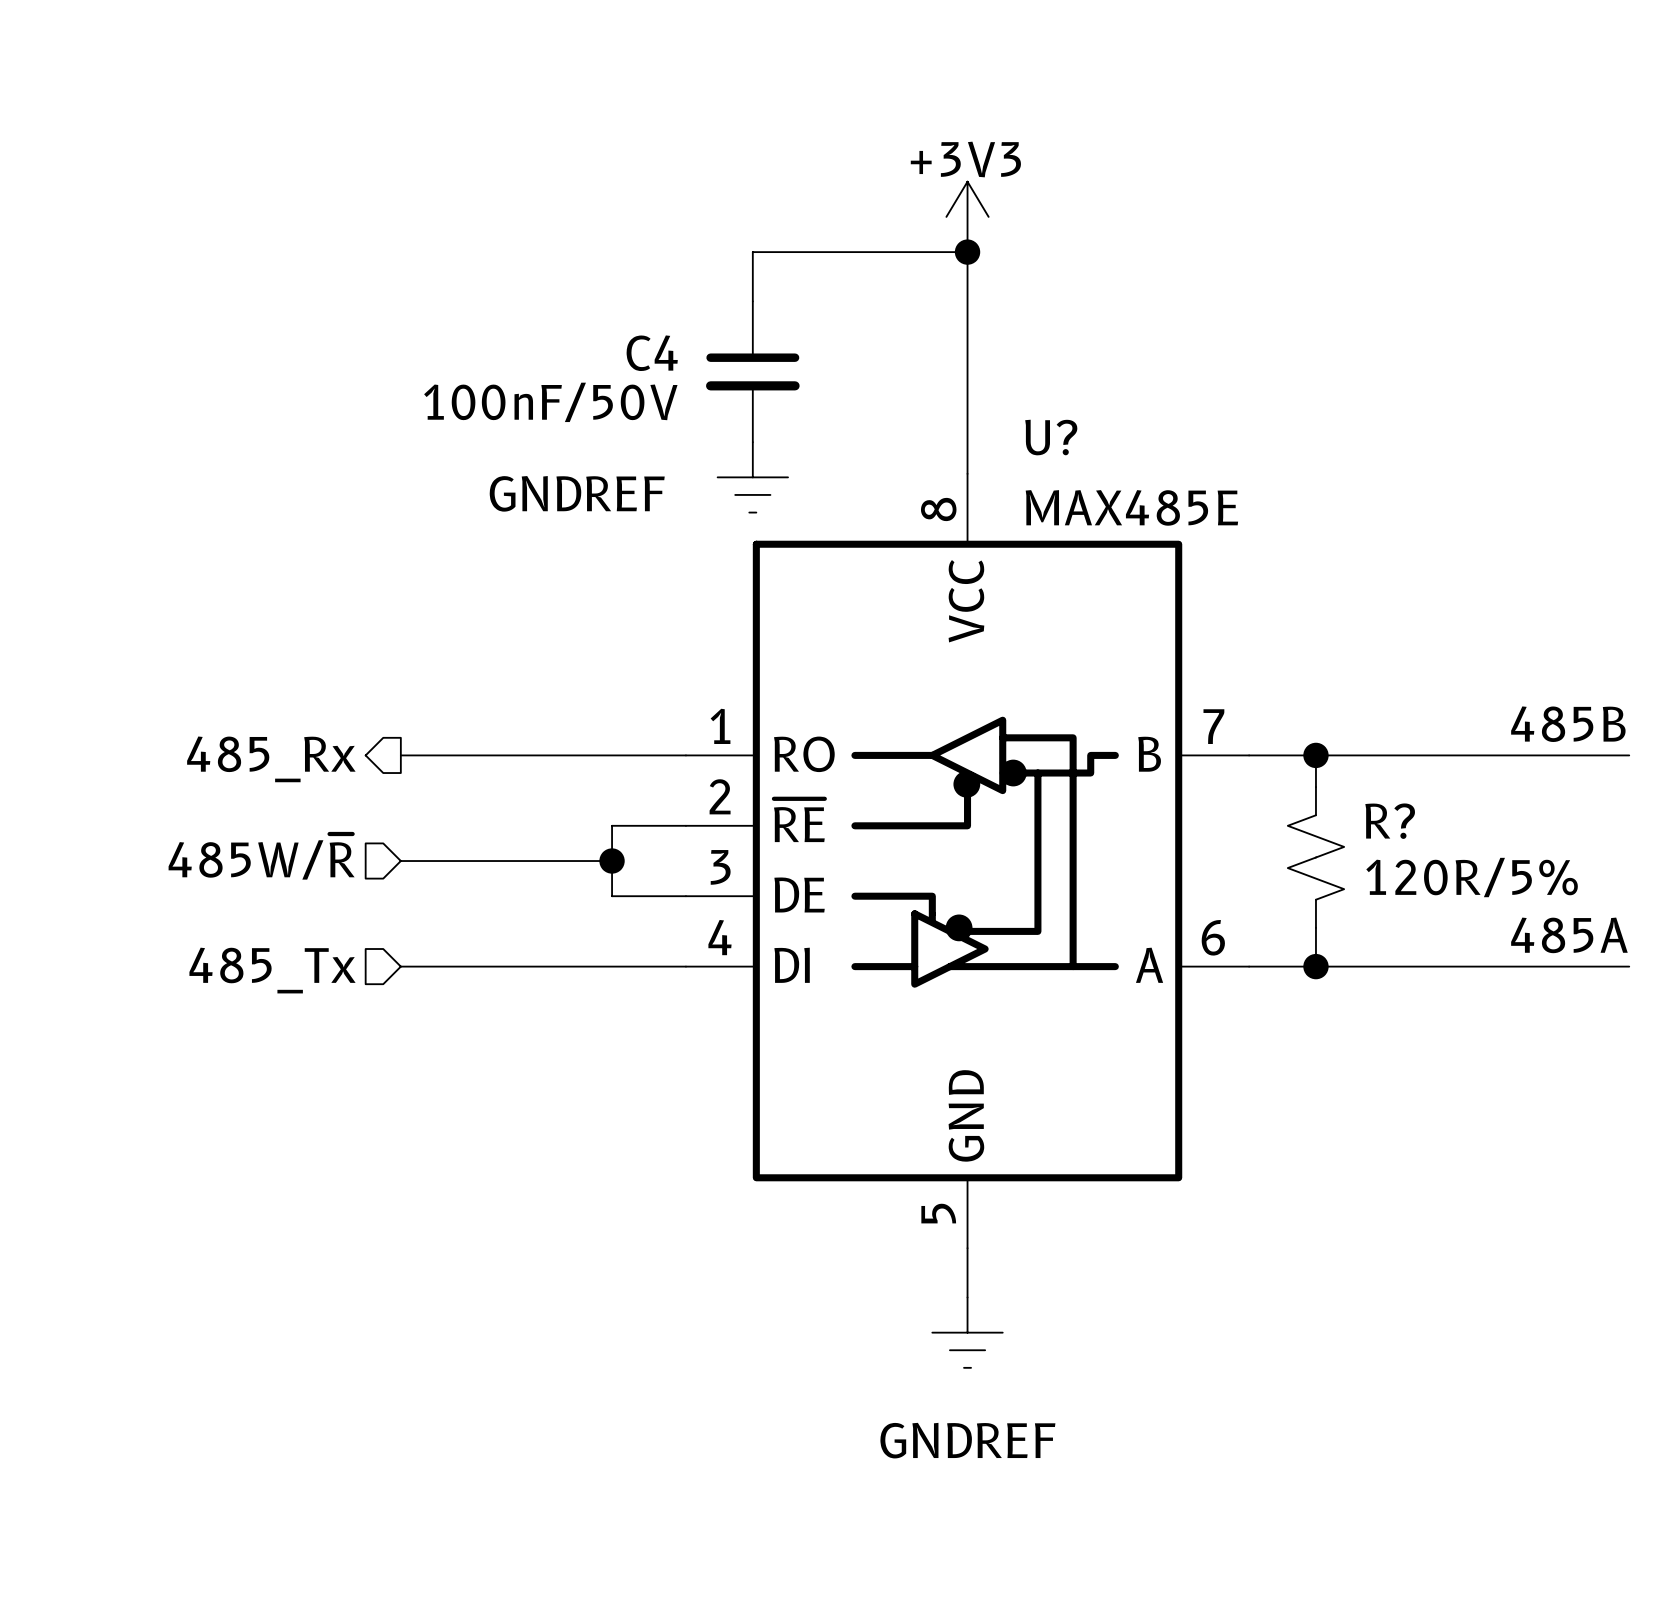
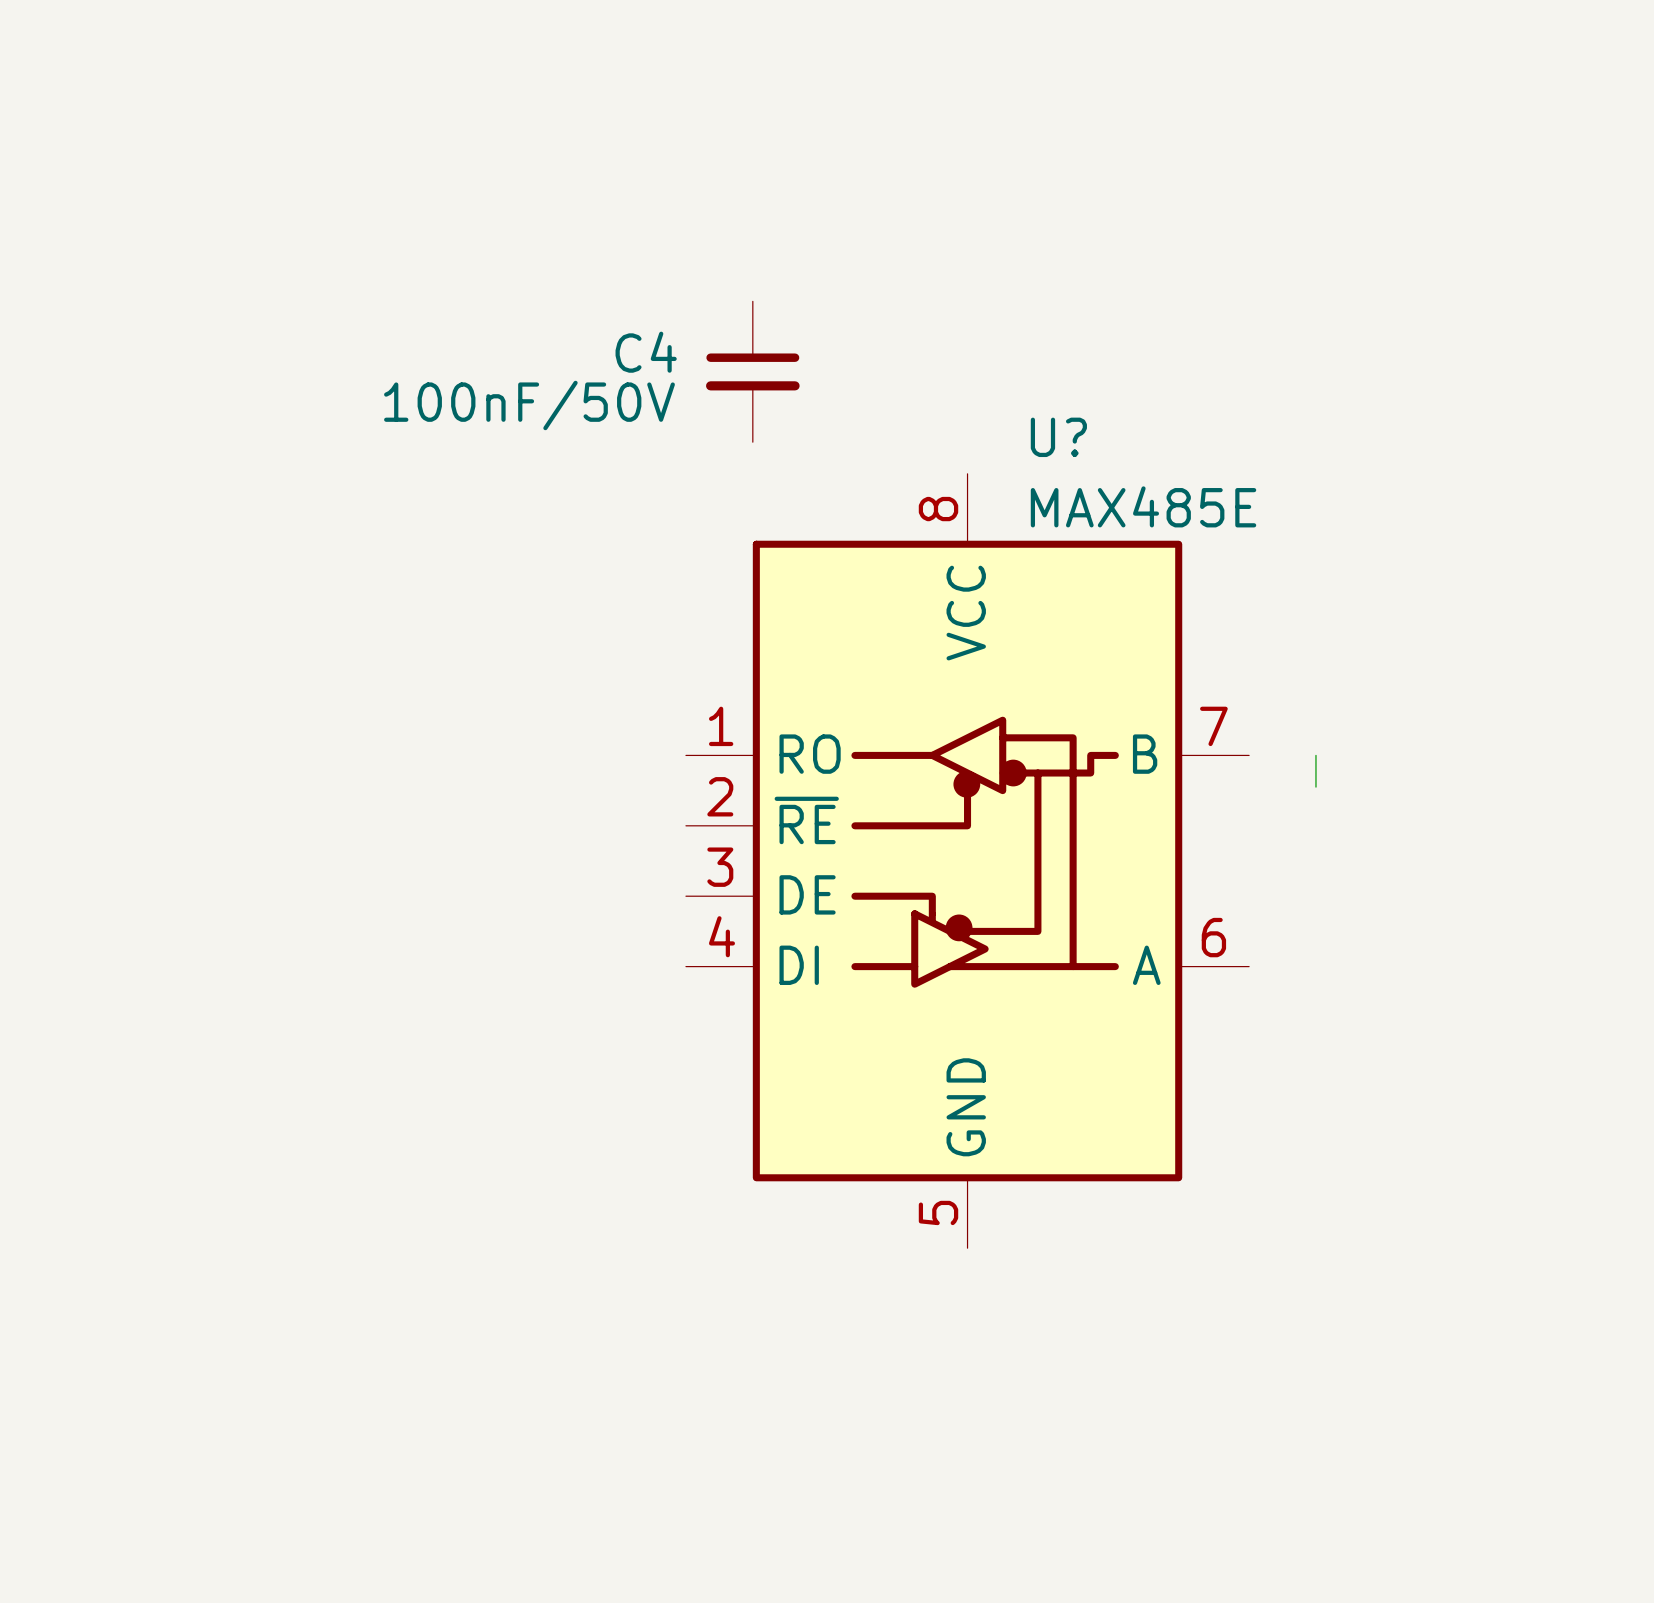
power symbol: +3V3 (967, 216) -> none
junction: (967, 252) -> none
wire: (752, 301) (752, 252) (967, 252) (967, 473) -> none
power symbol: GNDREF (752, 477) -> none
label: 485B (1568, 724) -> none
wire: (400, 755) (685, 755) -> none
wire: (1249, 755) (1629, 755) -> none
junction: (1315, 755) -> none
hierarchical label: 485_Rx (271, 759) -> none
wire: (685, 825) (612, 825) (612, 896) (685, 896) -> none
hierarchical label: 485W/~{R} (261, 856) -> none
R?: 120R/5% (1315, 857) -> none
wire: (400, 861) (612, 861) -> none
junction: (612, 861) -> none
wire: (1315, 927) (1315, 966) -> none
label: 485A (1569, 935) -> none
wire: (400, 966) (685, 966) -> none
wire: (1249, 966) (1629, 966) -> none
junction: (1315, 966) -> none
hierarchical label: 485_Tx (272, 970) -> none
wire: (967, 1248) (967, 1297) -> none
power symbol: GNDREF (967, 1332) -> none

